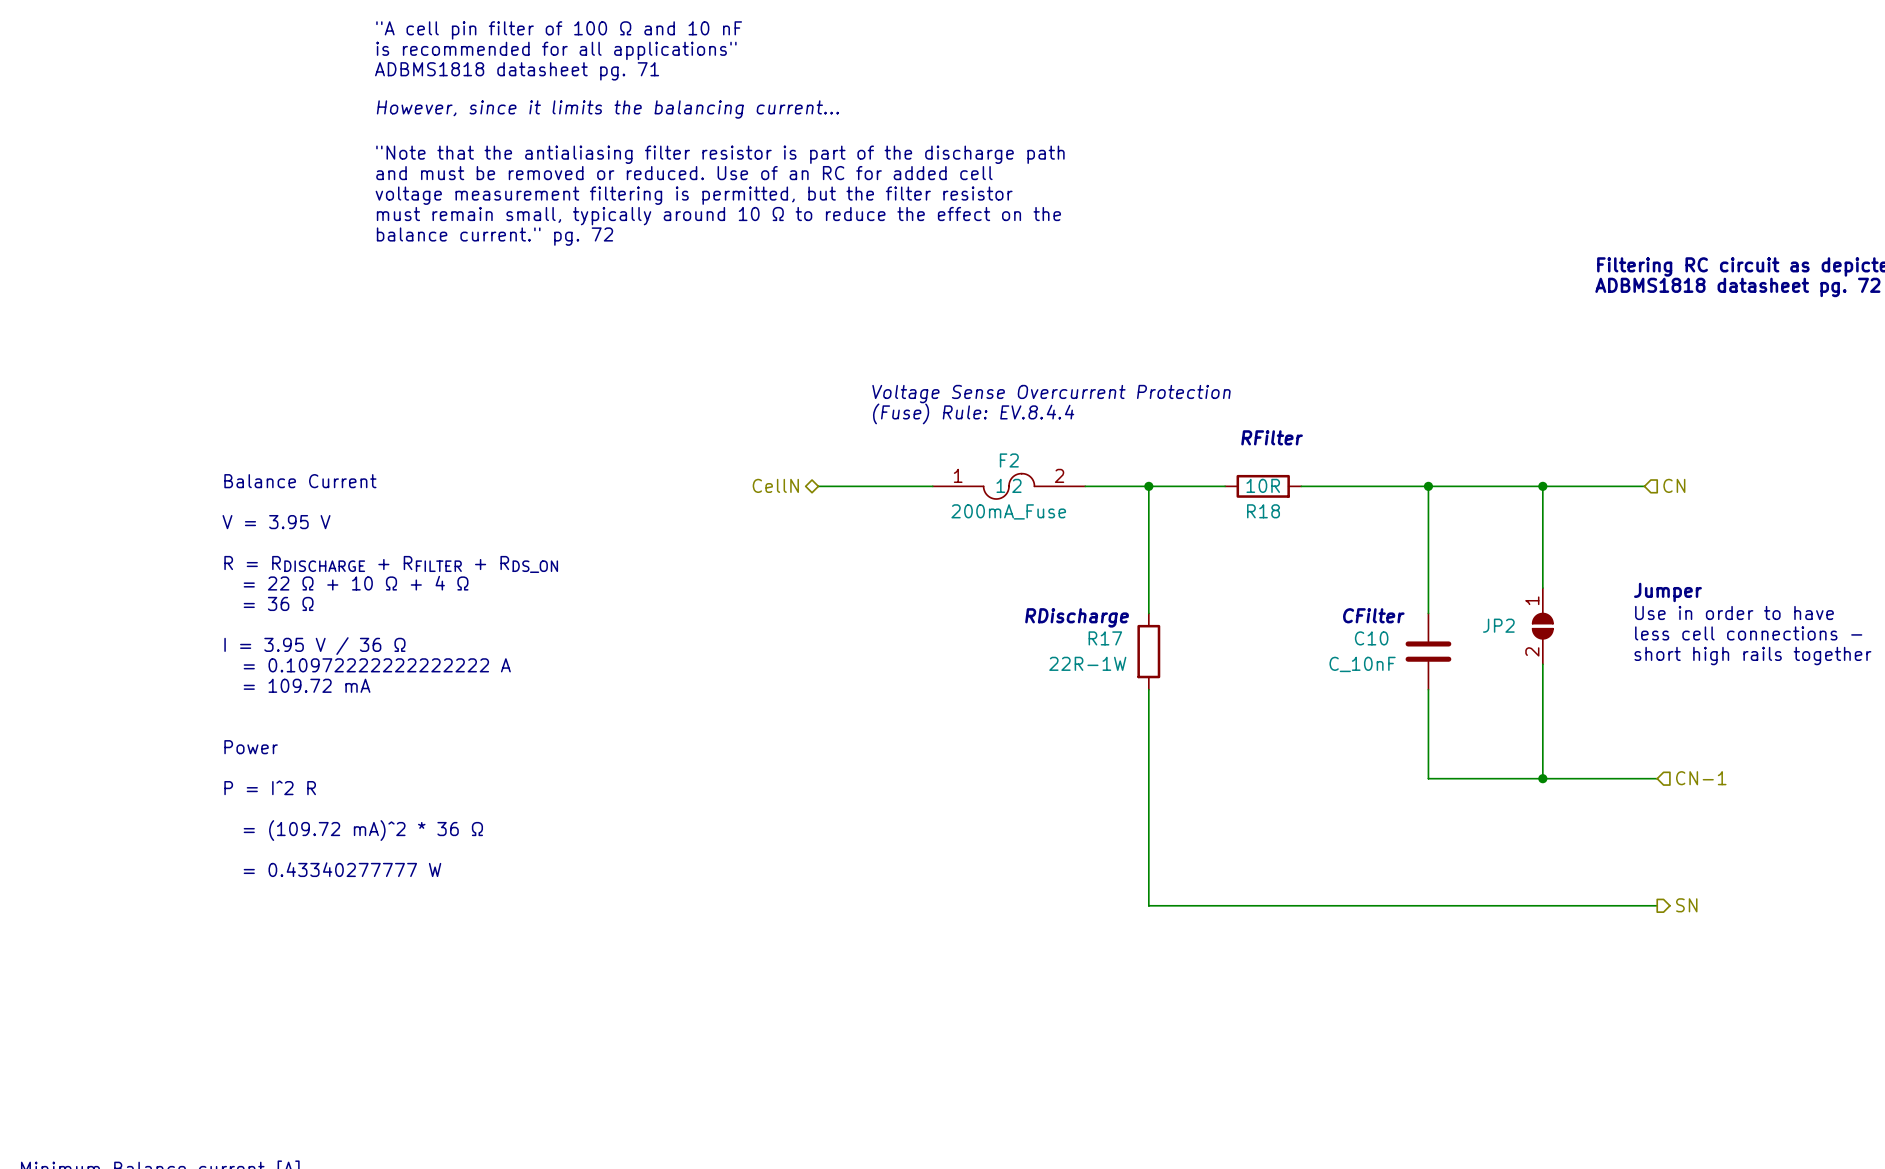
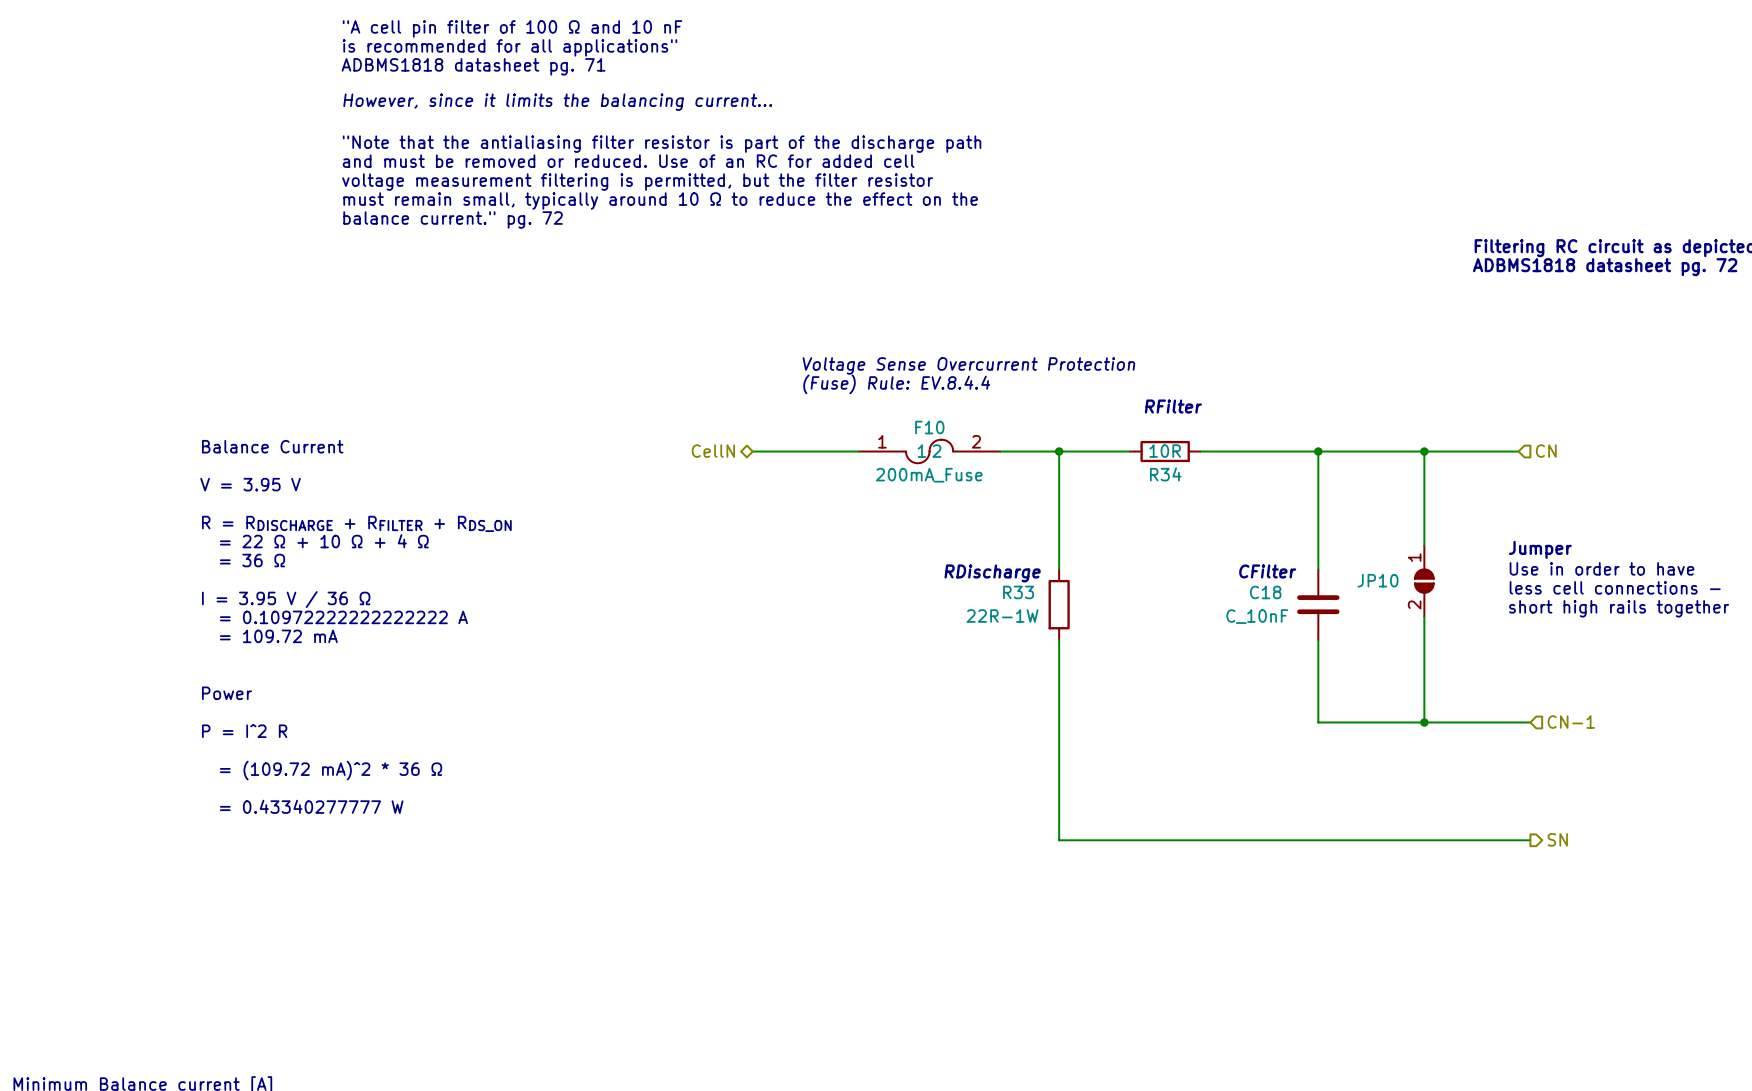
F2 name: F2 (1009, 460) -> F10 (929, 427)
R18 name: R18 (1263, 511) -> R34 (1165, 474)
JP2 name: JP2 (1498, 625) -> JP10 (1377, 580)
R17 name: R17 (1105, 638) -> R33 (1018, 592)
C10 name: C10 (1371, 638) -> C18 (1265, 592)

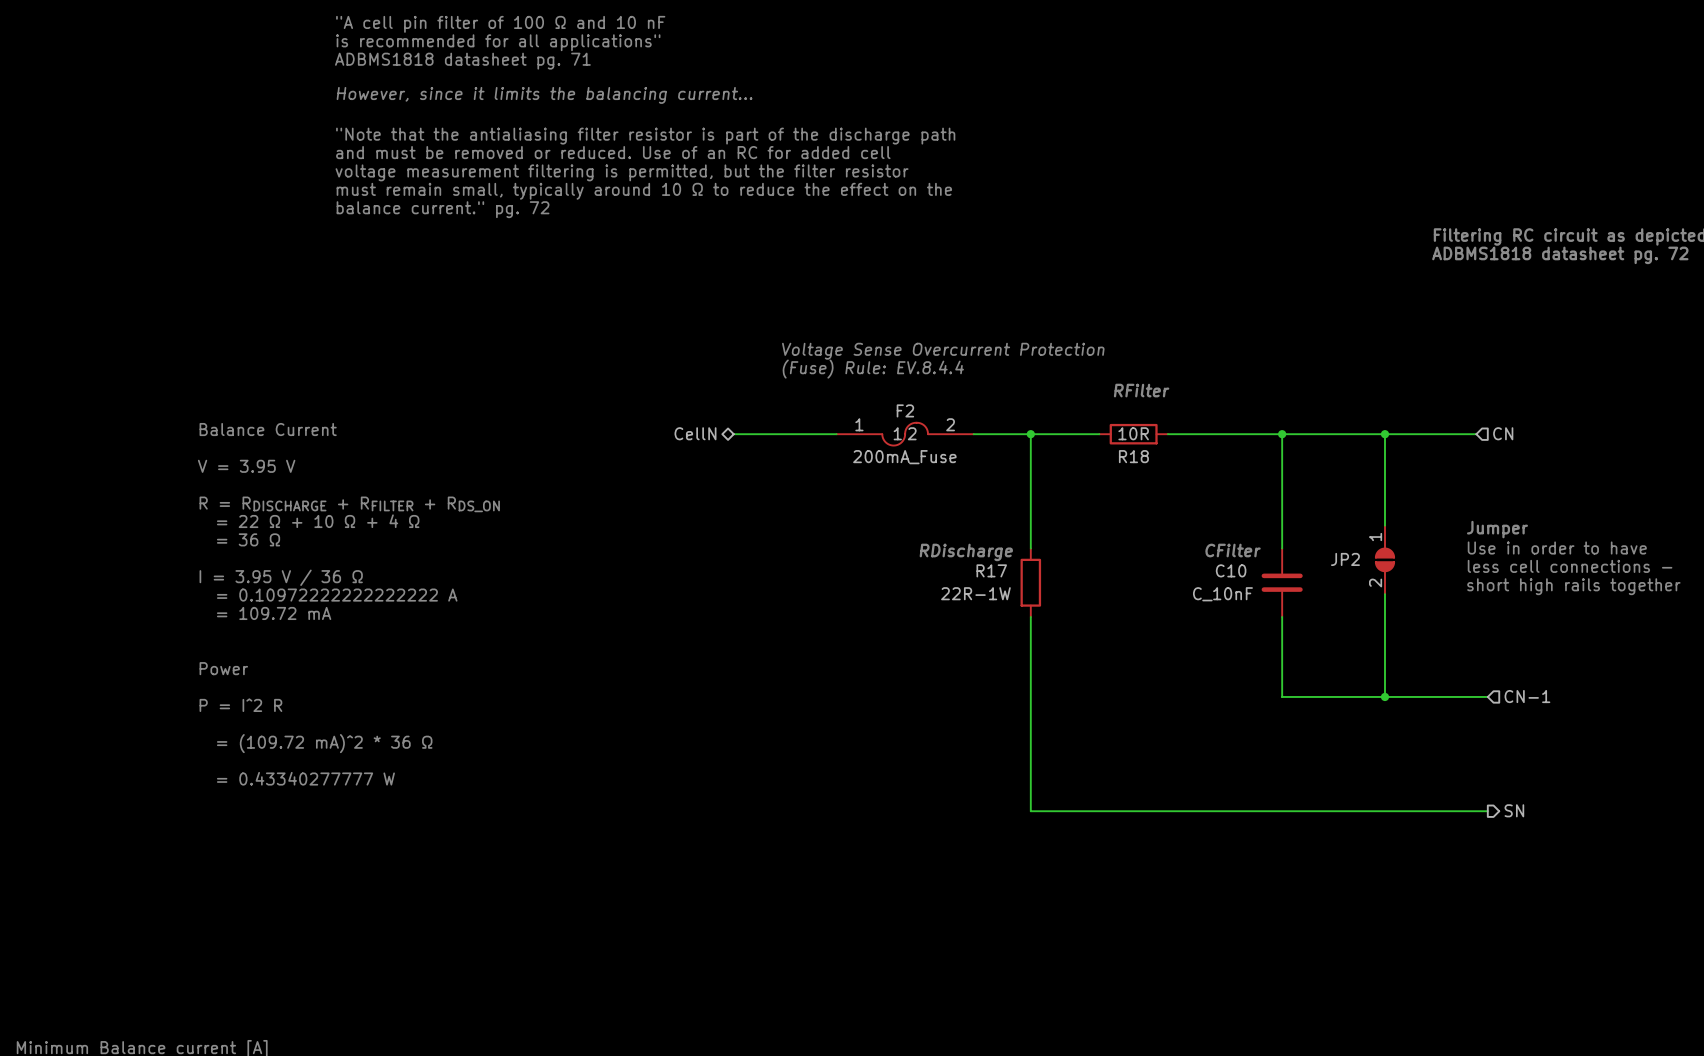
F10 name: F10 (929, 427) -> F2 (905, 410)
R34 name: R34 (1165, 474) -> R18 (1133, 456)
JP10 name: JP10 (1377, 580) -> JP2 (1345, 559)
R33 name: R33 (1018, 592) -> R17 (991, 570)
C18 name: C18 (1265, 592) -> C10 (1231, 570)

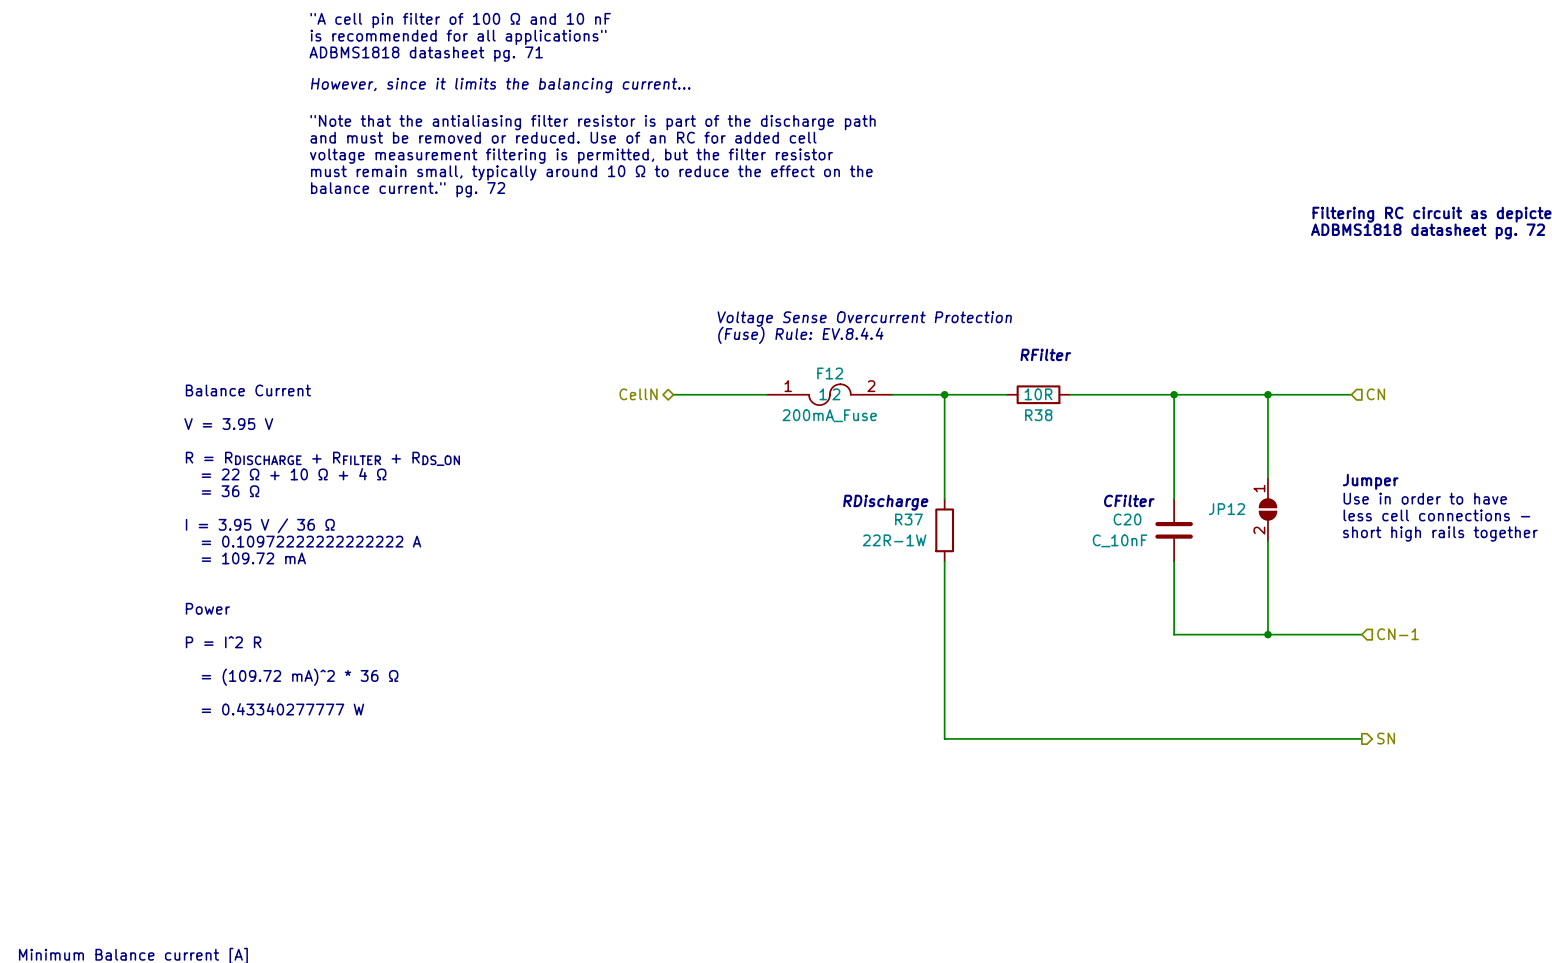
F2 name: F2 (905, 410) -> F12 (830, 373)
R18 name: R18 (1133, 456) -> R38 (1038, 415)
JP2 name: JP2 (1345, 559) -> JP12 (1226, 509)
R17 name: R17 (991, 570) -> R37 (908, 519)
C10 name: C10 (1231, 570) -> C20 (1127, 519)

